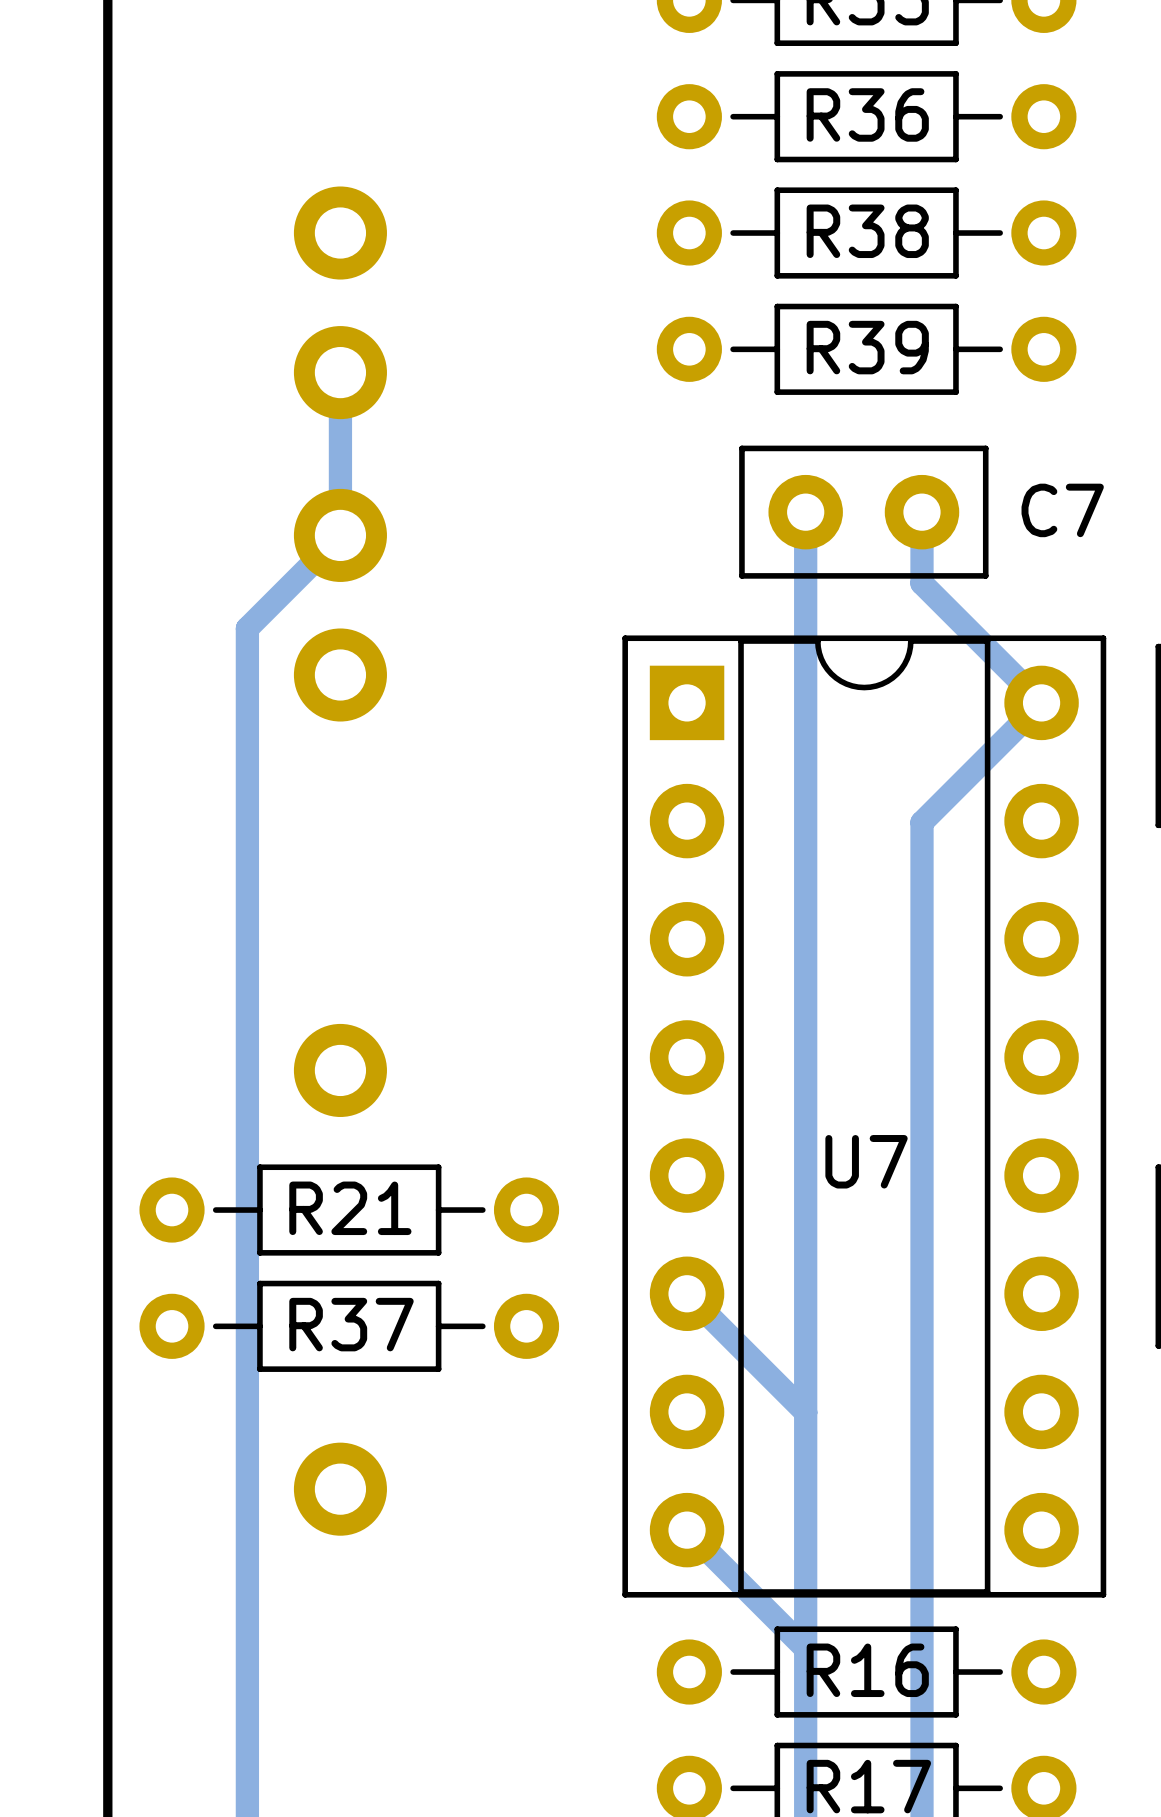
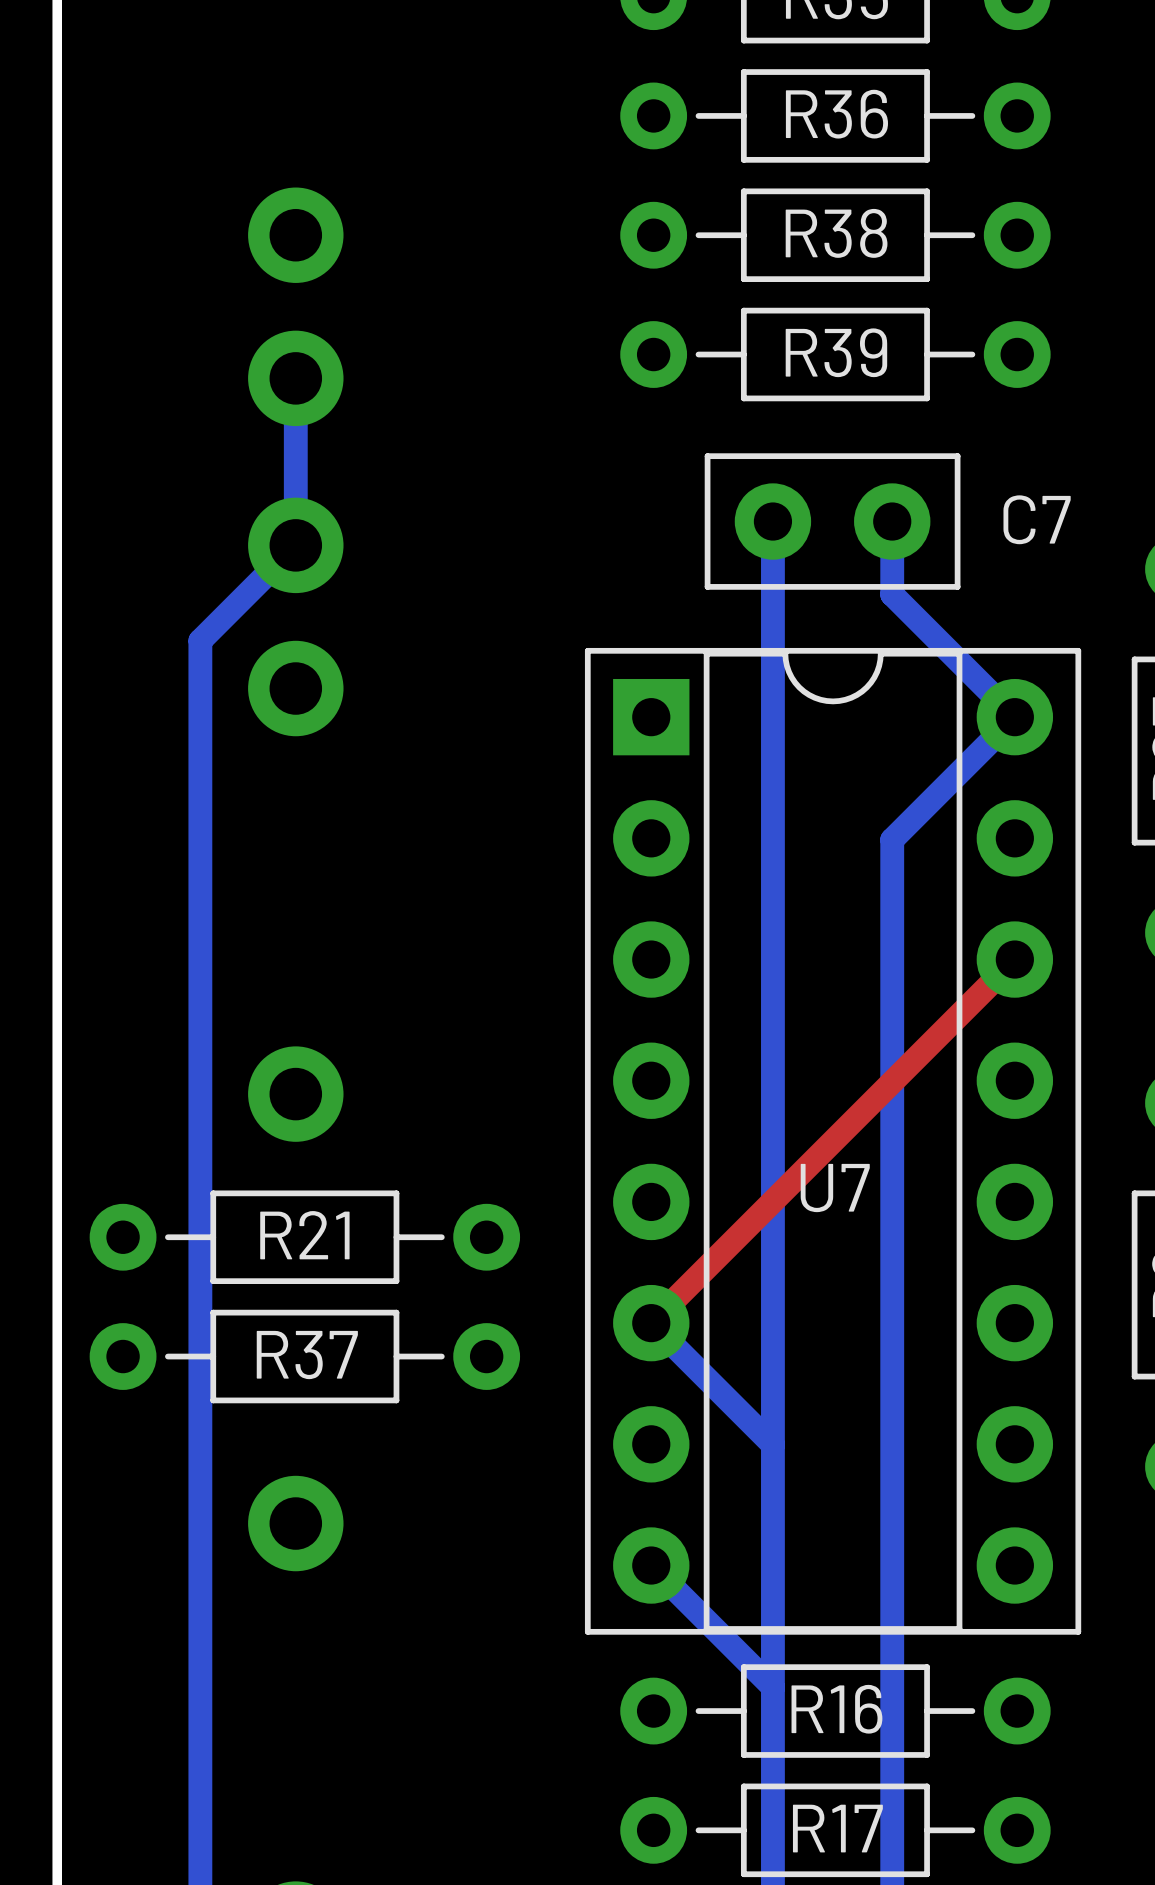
top track: none -> (1014, 959) (651, 1323)

